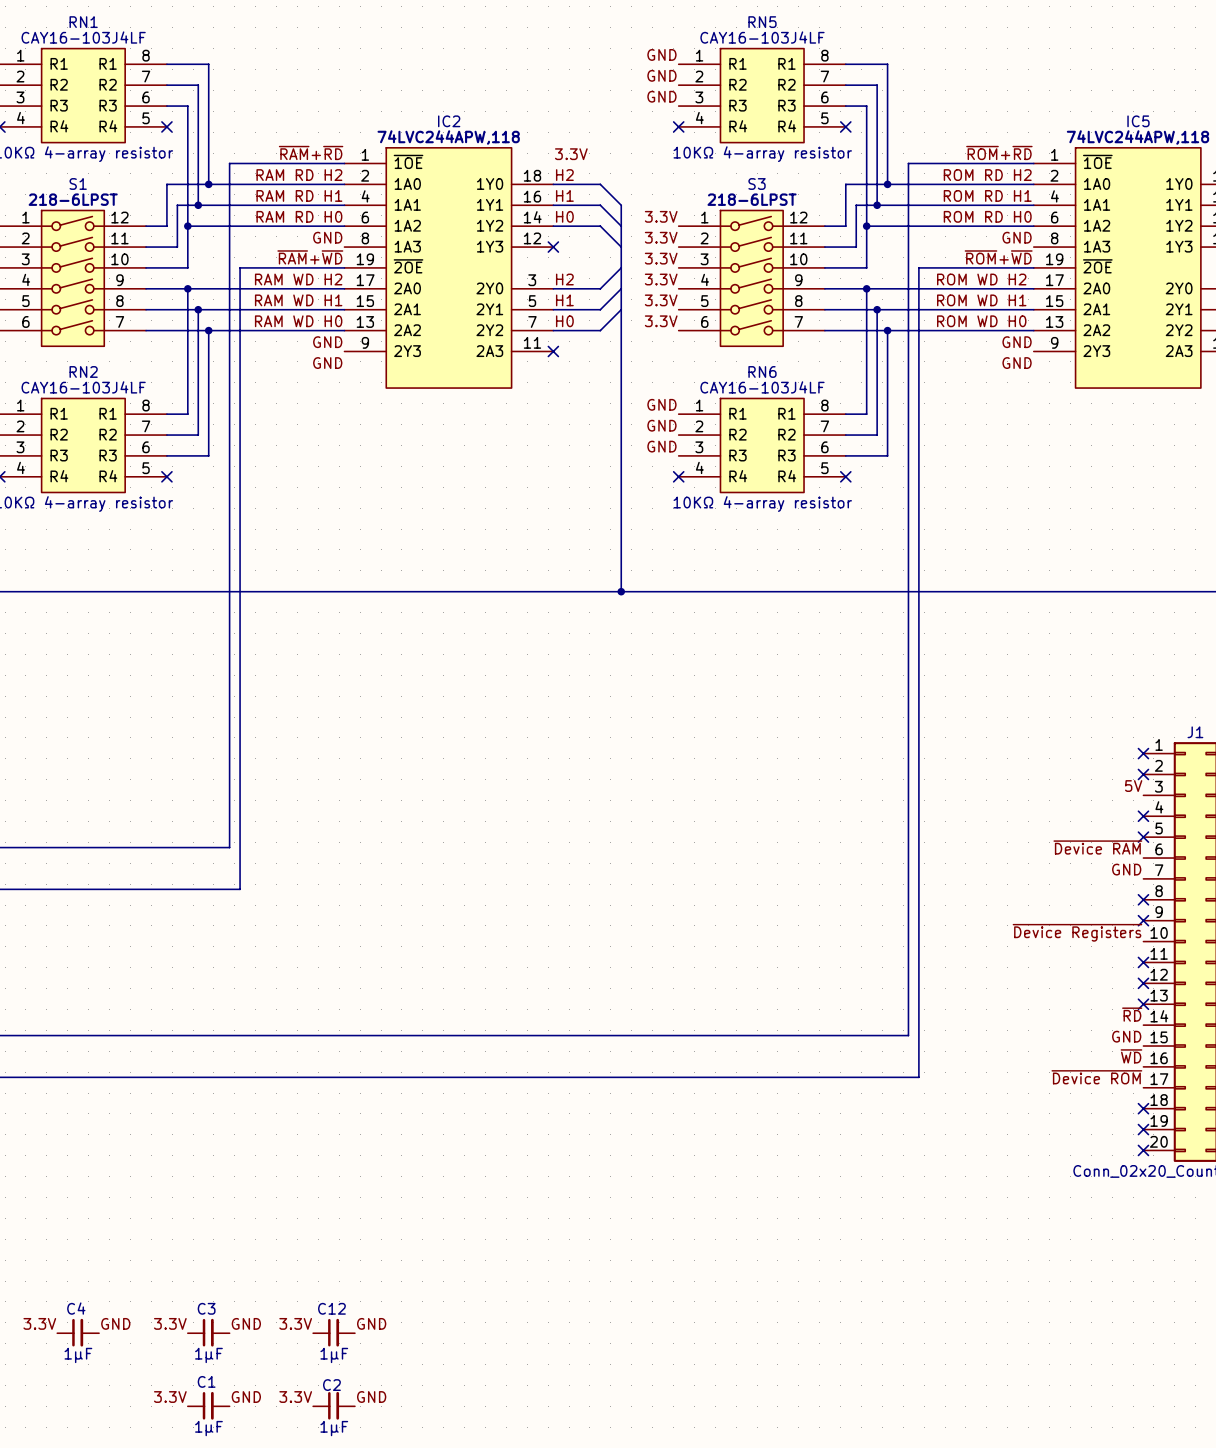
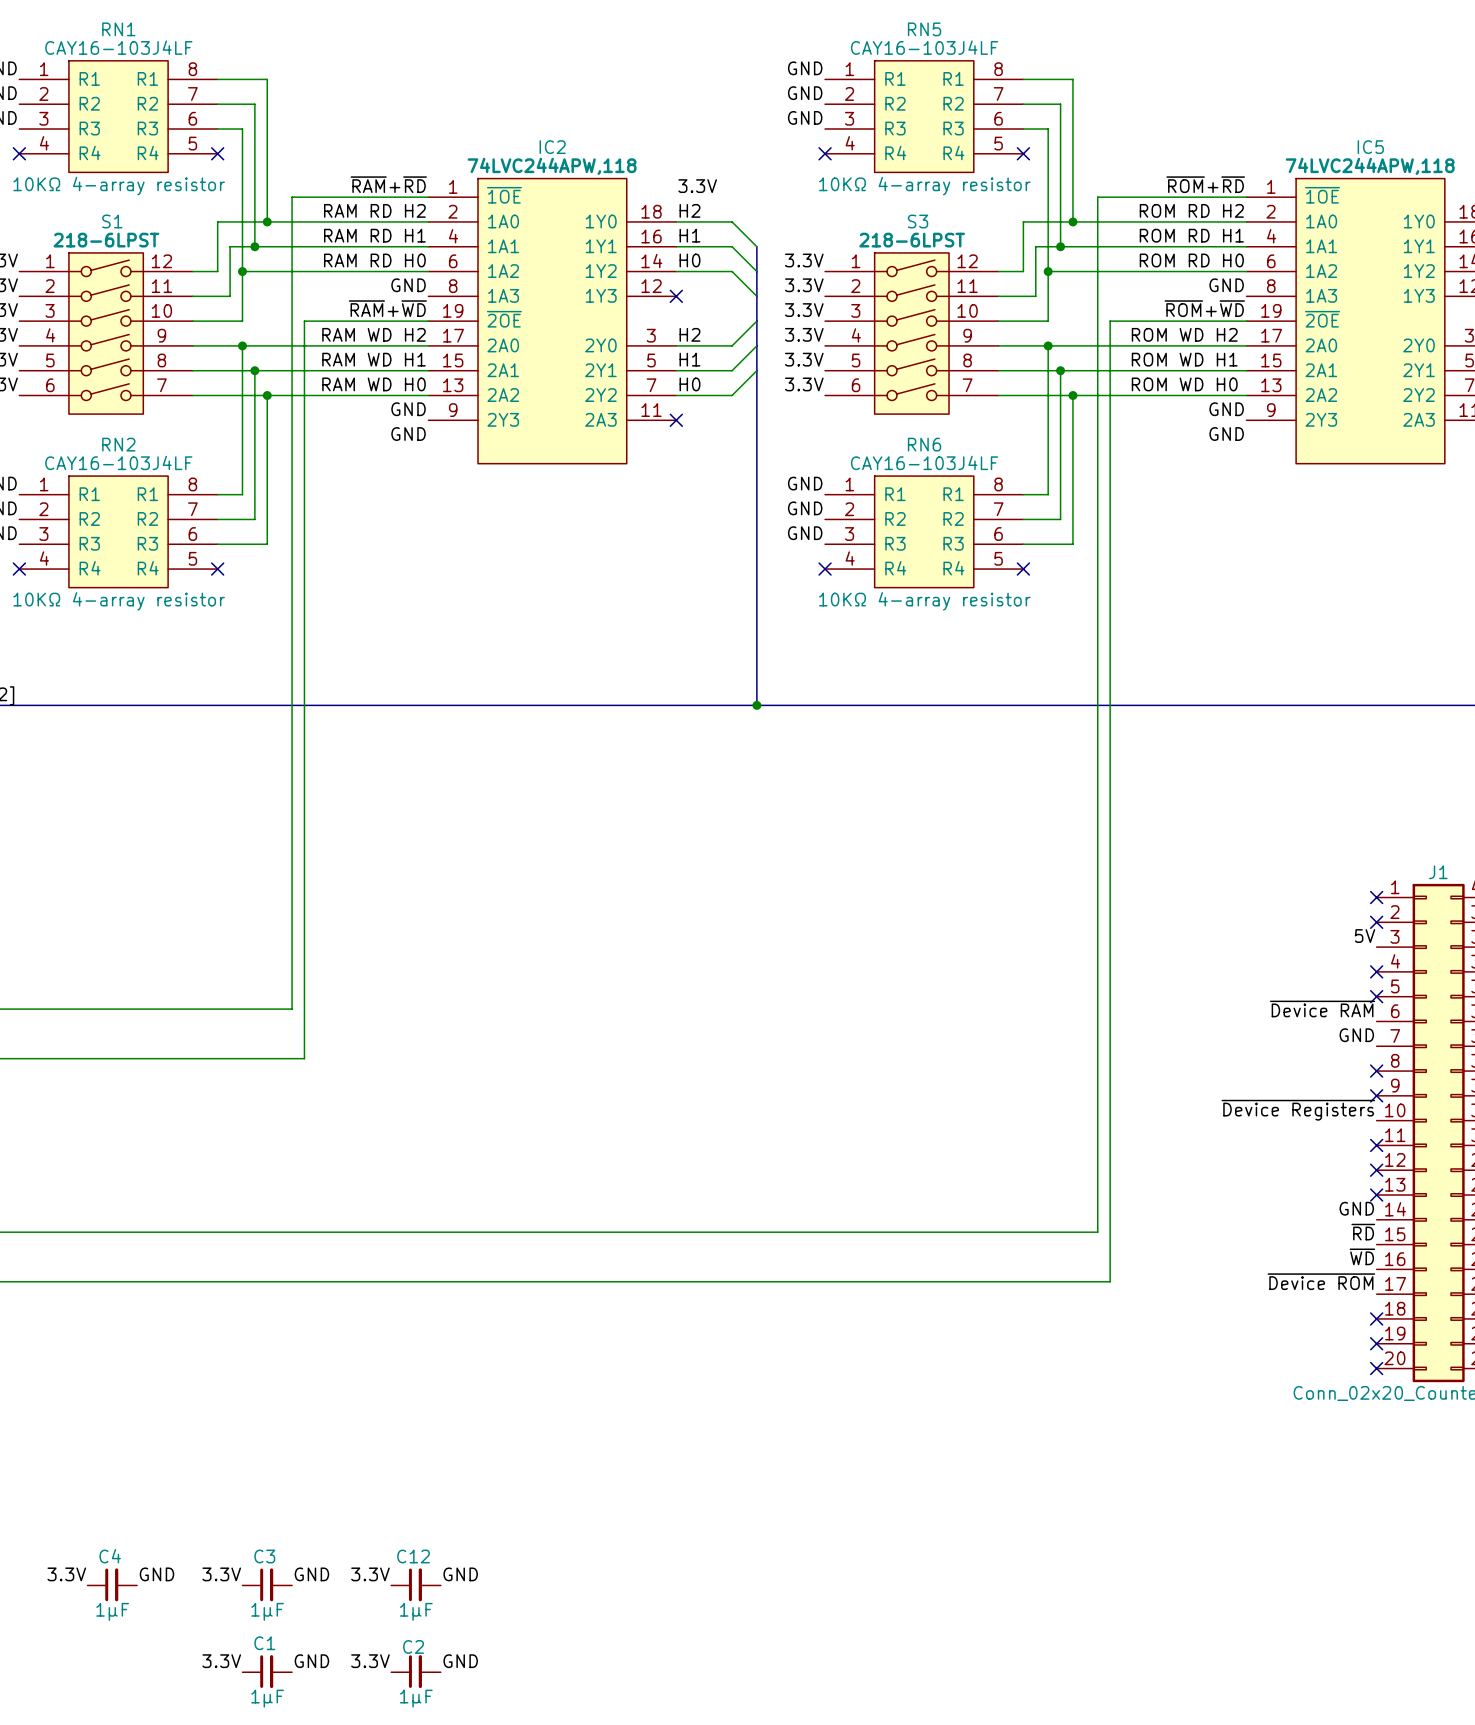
label: ~{RD} (1132, 1014) -> GND (1356, 1208)
label: GND (1126, 1036) -> ~{RD} (1363, 1232)

